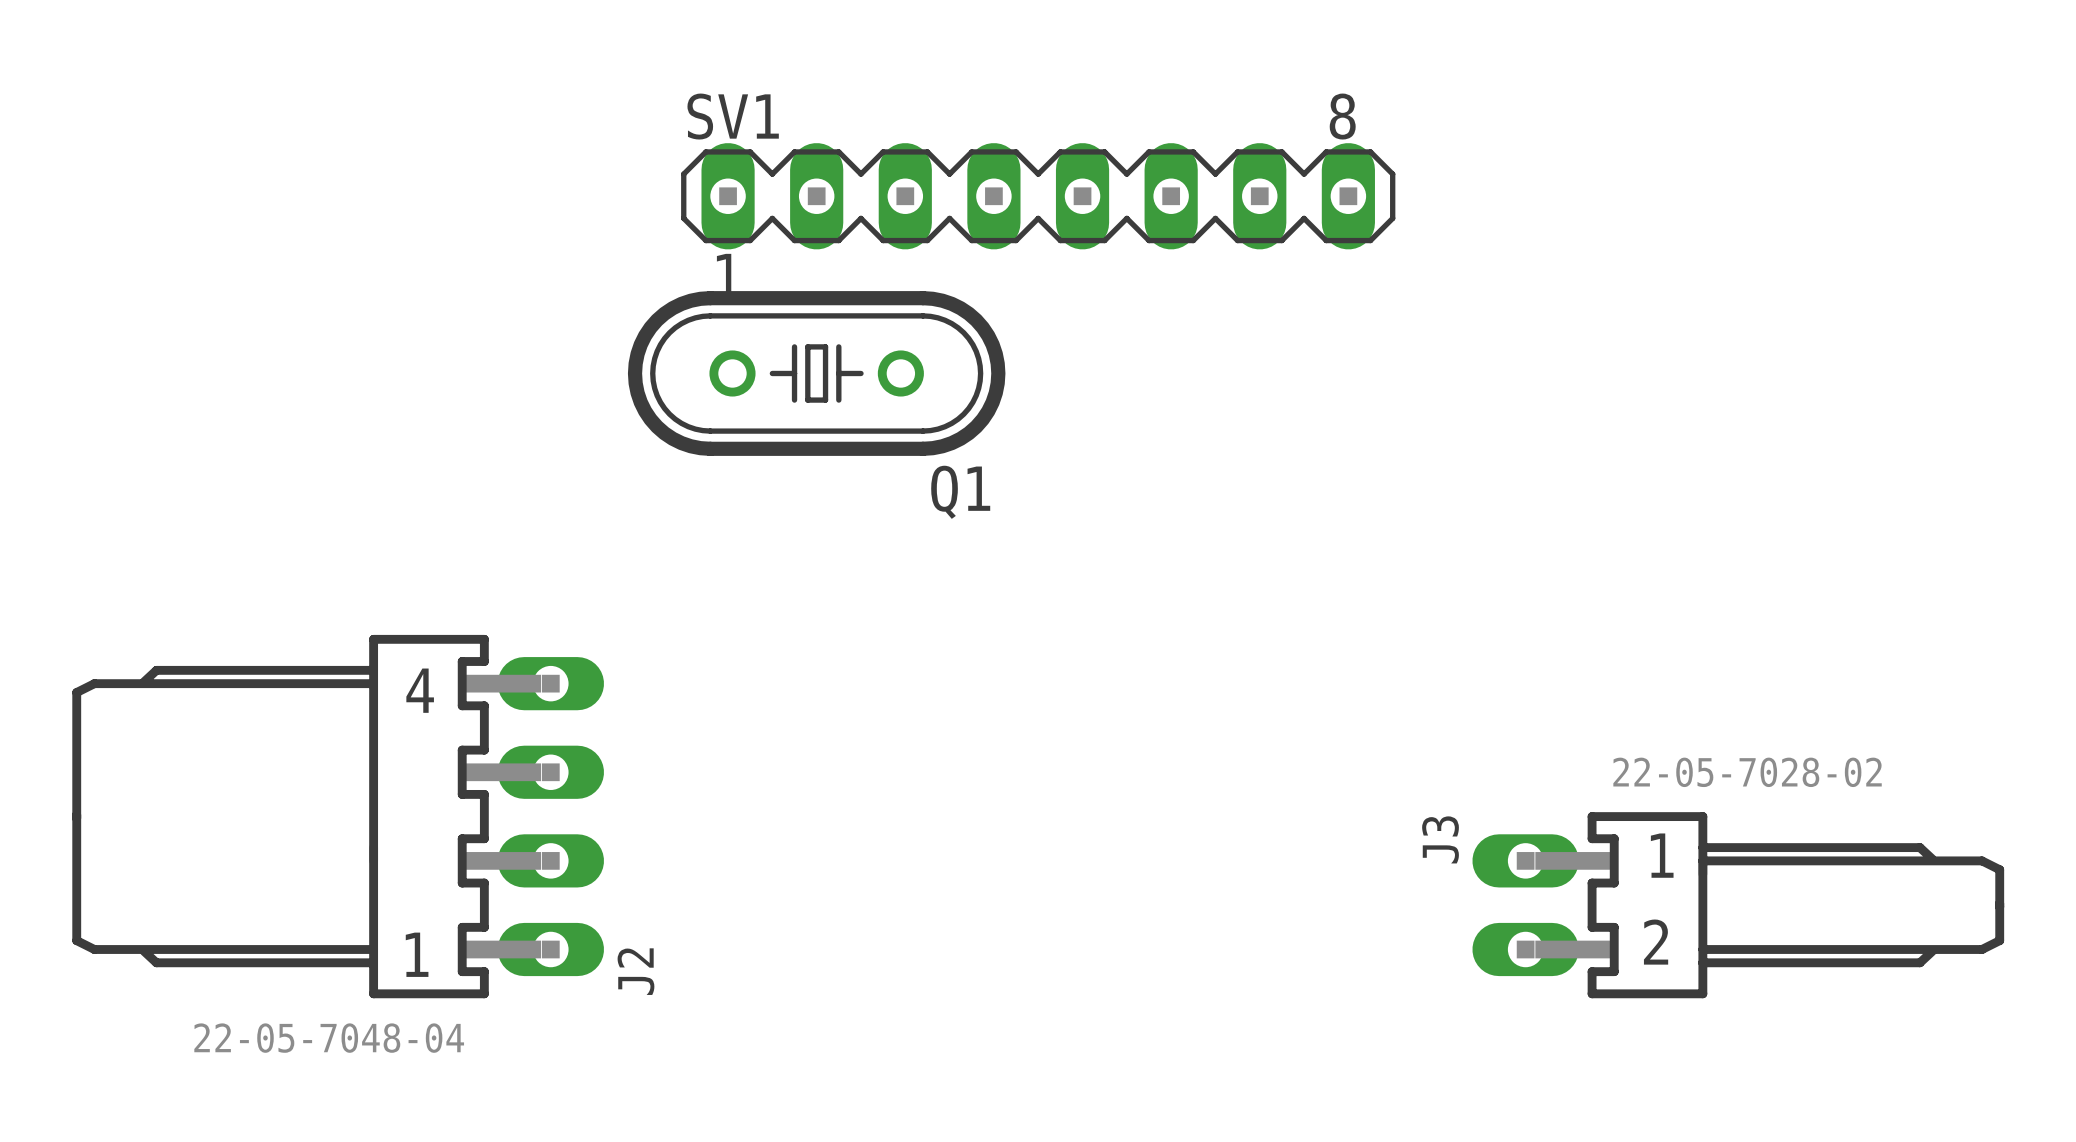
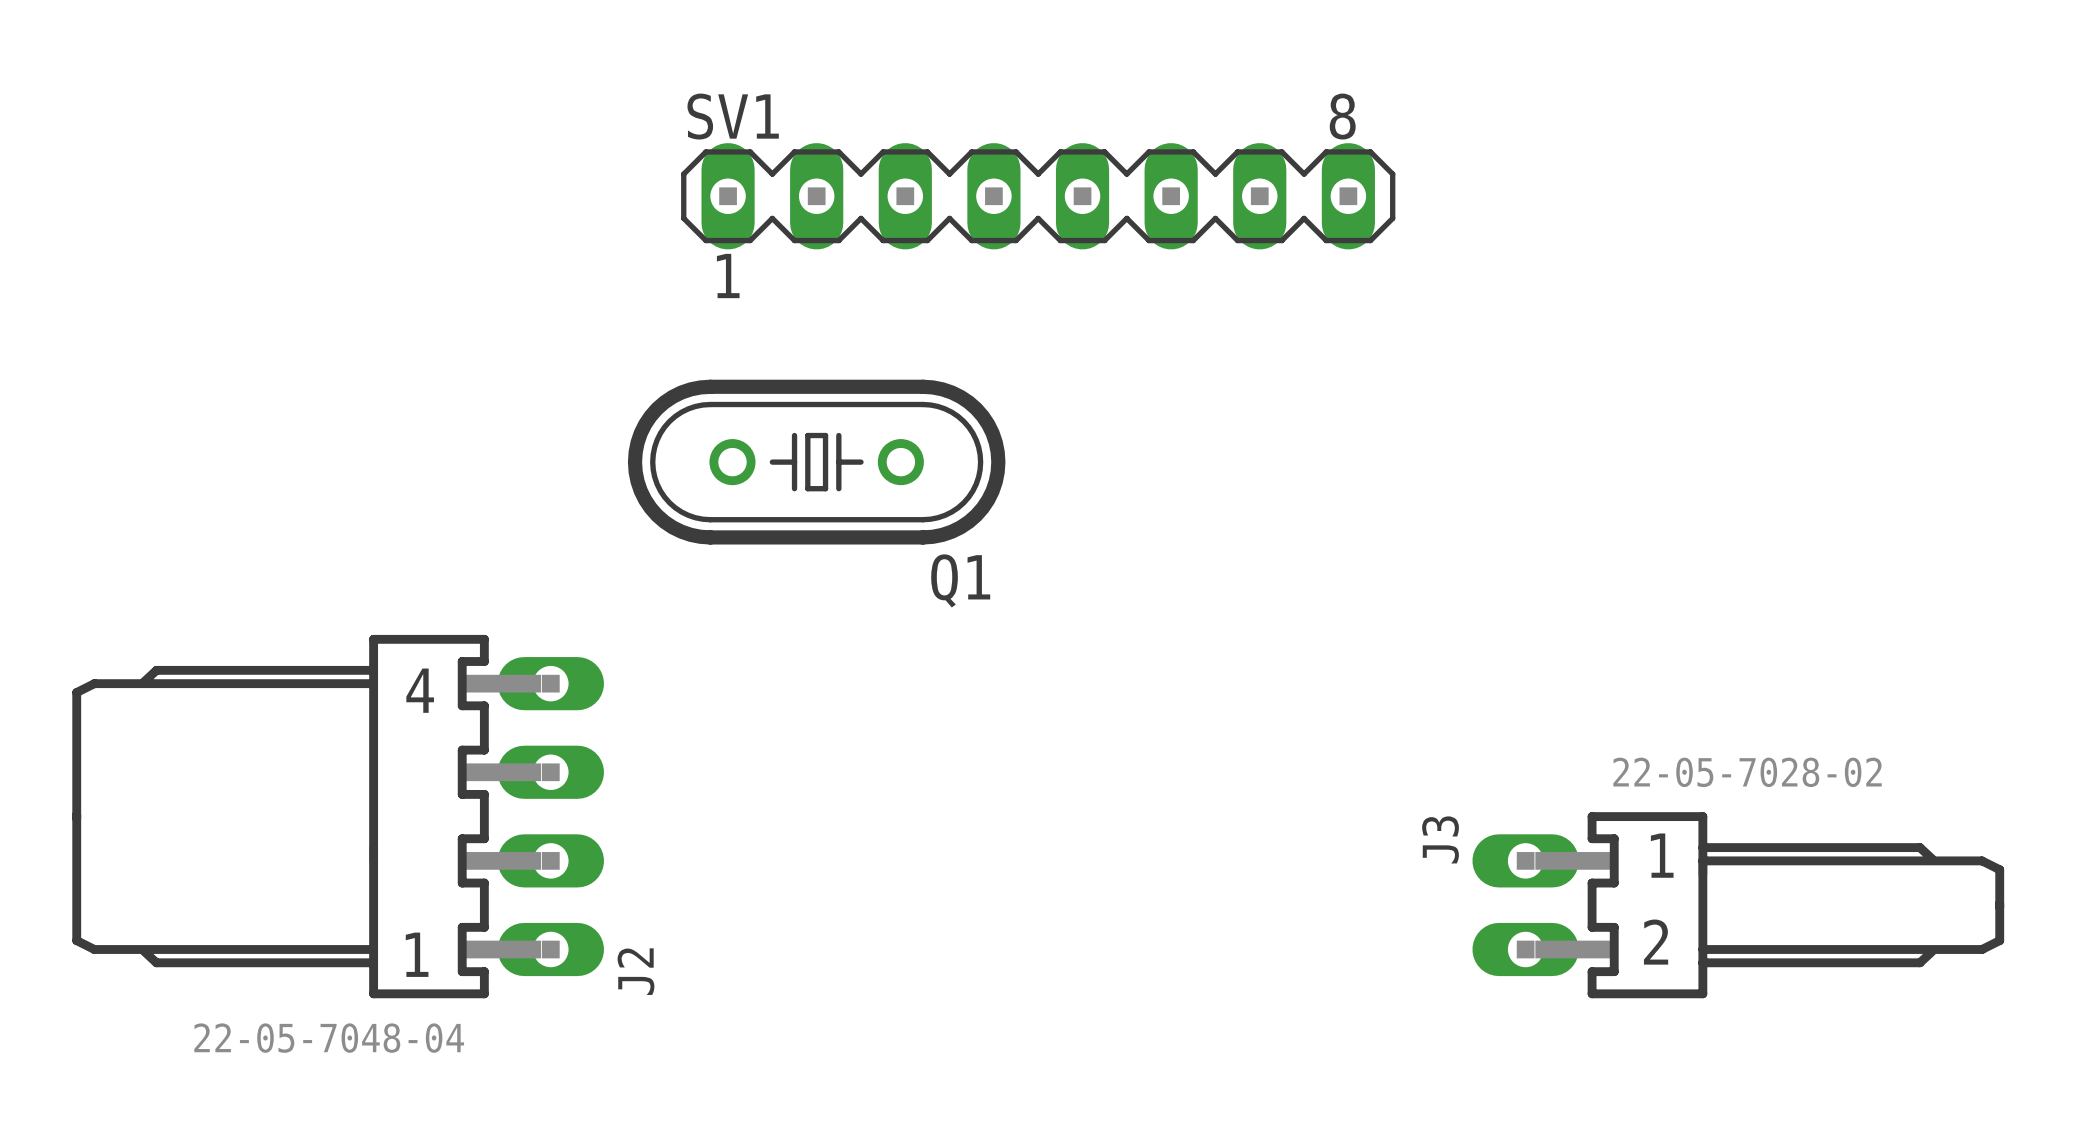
Q1 position: (816, 373) -> (816, 462)

